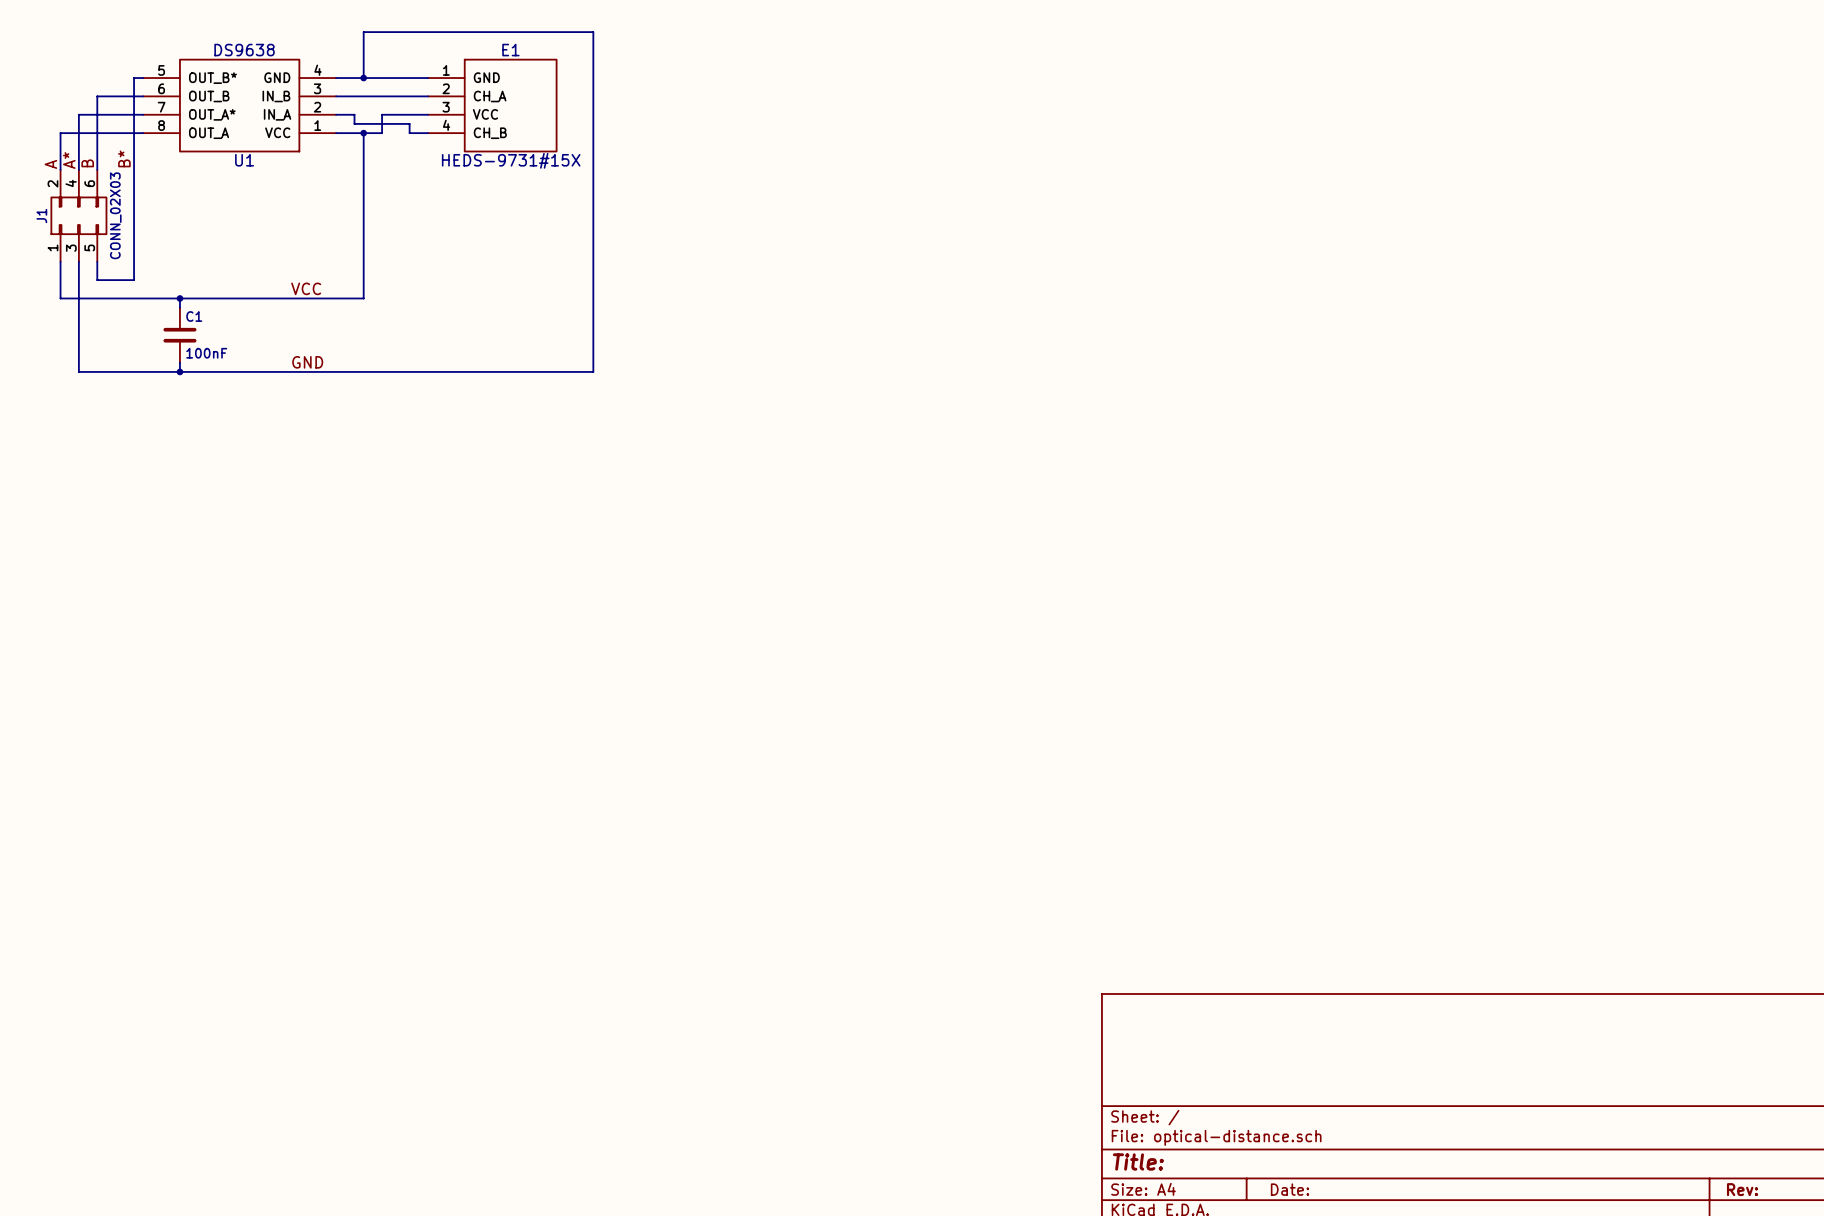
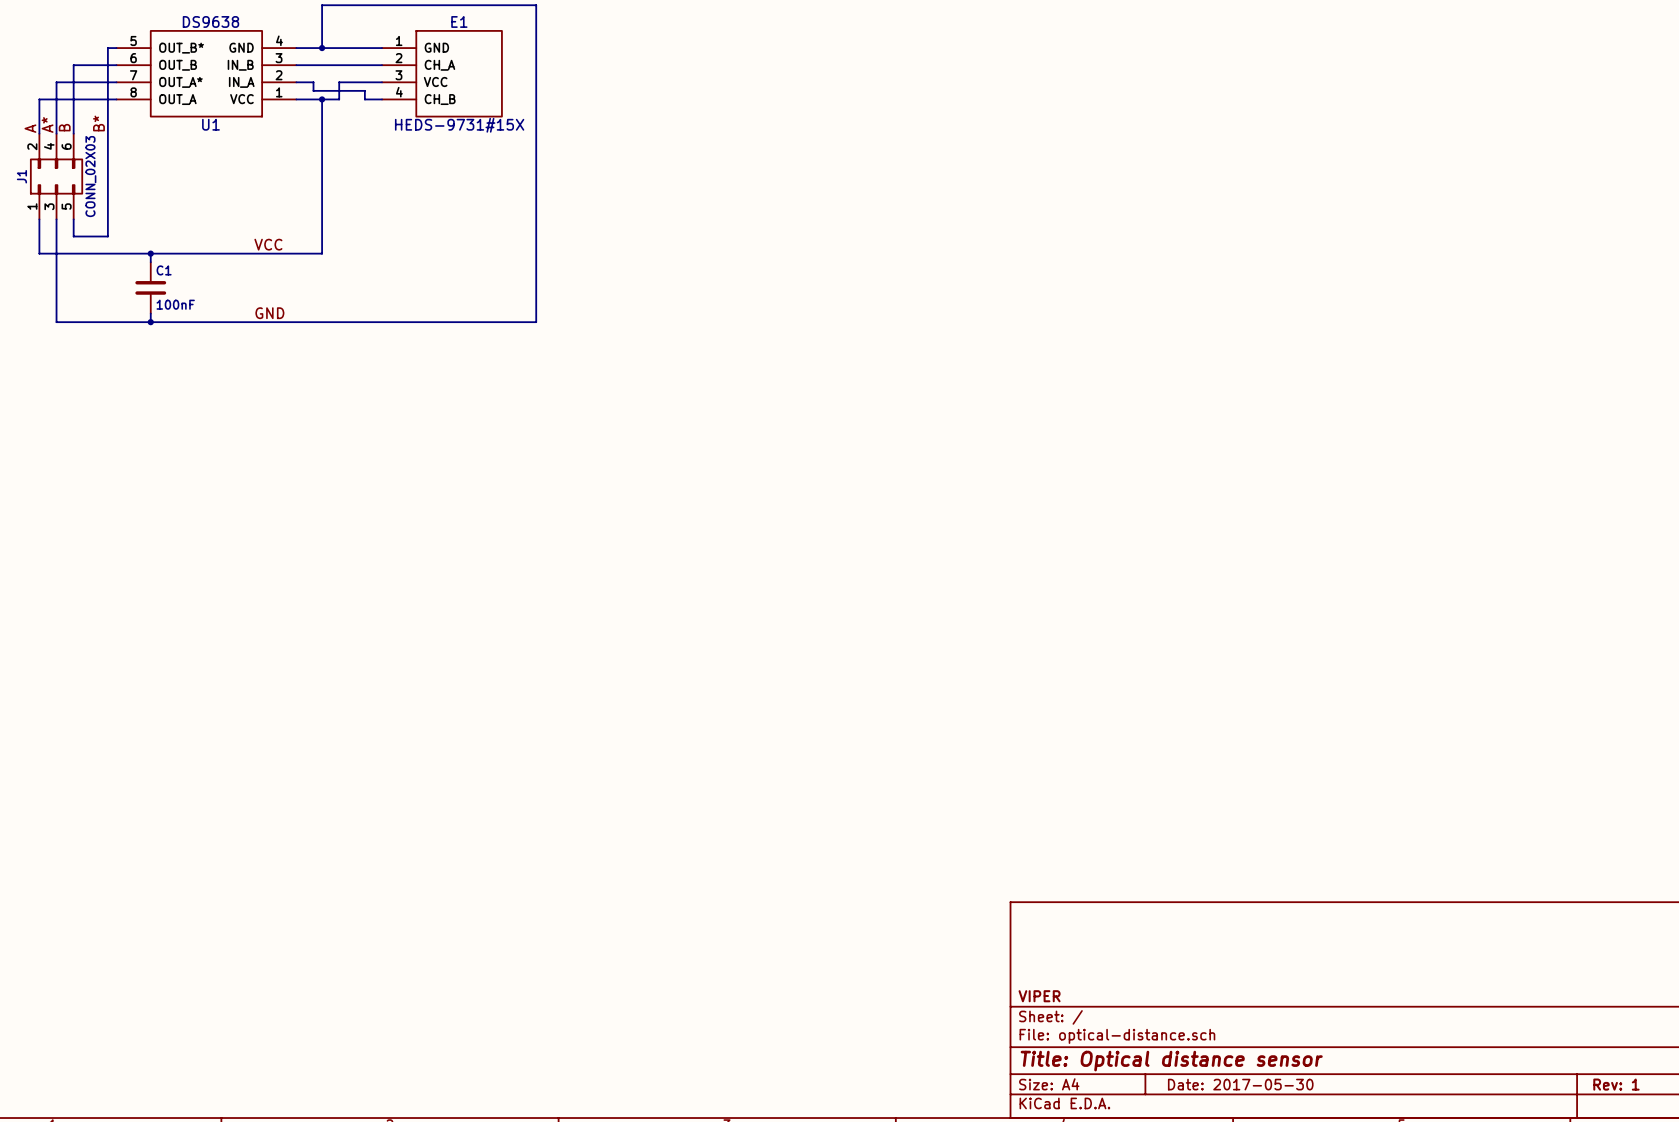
title block: none -> VIPER (1039, 996)
title block: Title: (1138, 1161) -> Title: Optical distance sensor (1171, 1061)
title block: Date: (1289, 1189) -> Date: 2017-05-30 (1240, 1084)
title block: Rev: (1742, 1189) -> Rev: 1 (1616, 1084)

